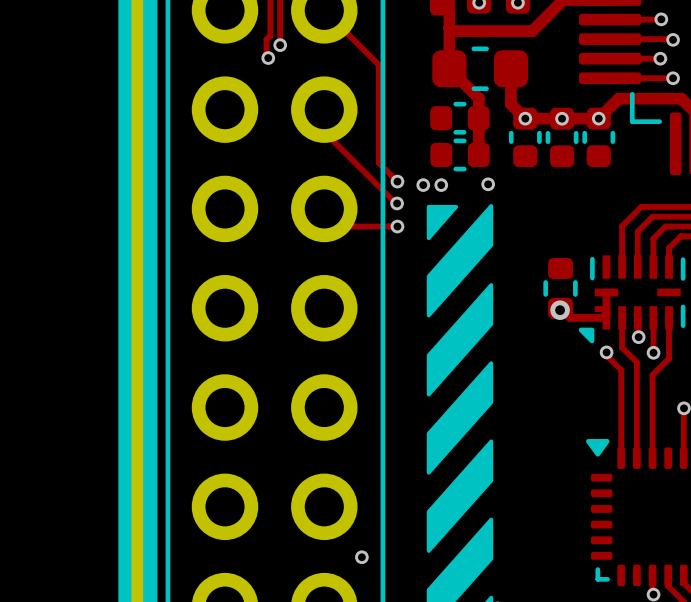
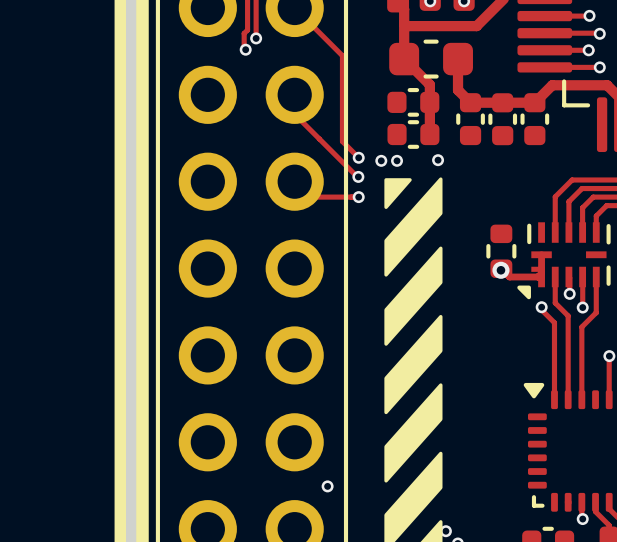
via: (525, 118) -> none
via: (562, 118) -> none
via: (598, 118) -> none

